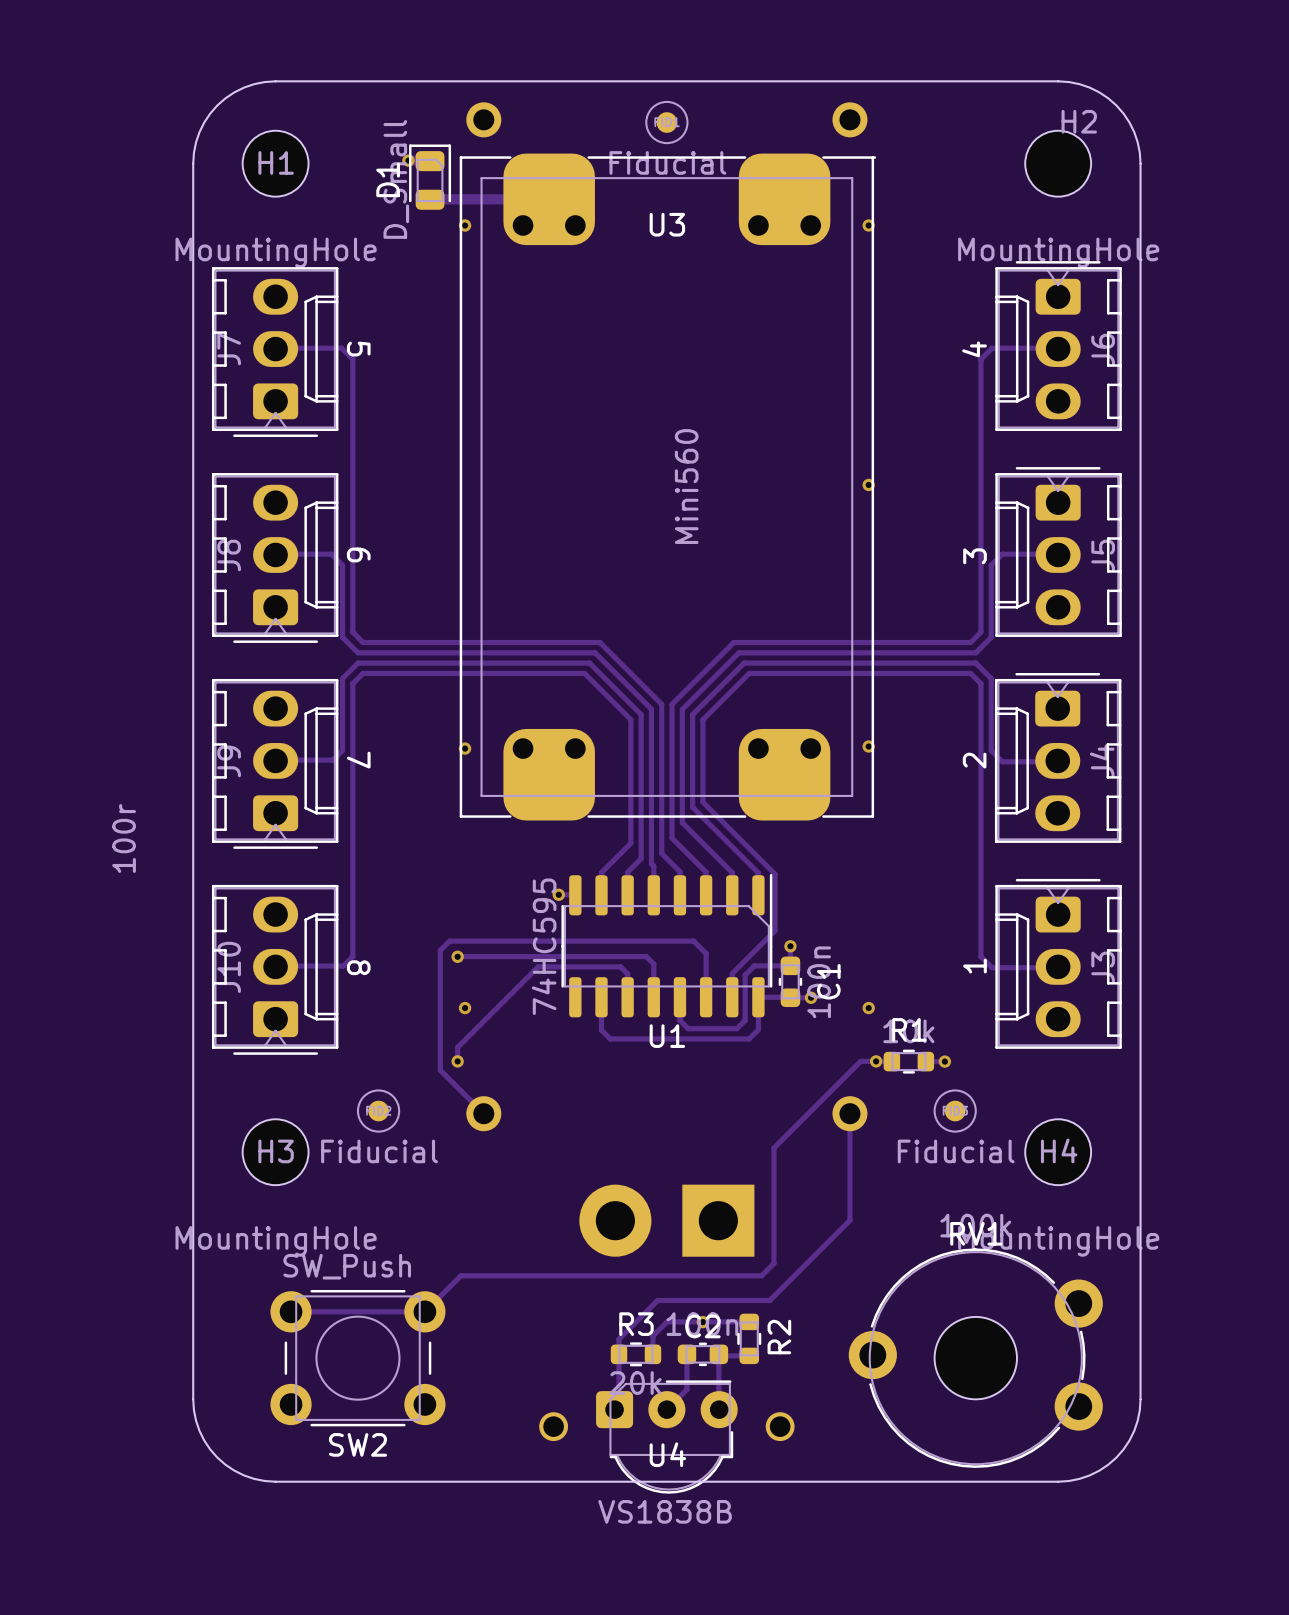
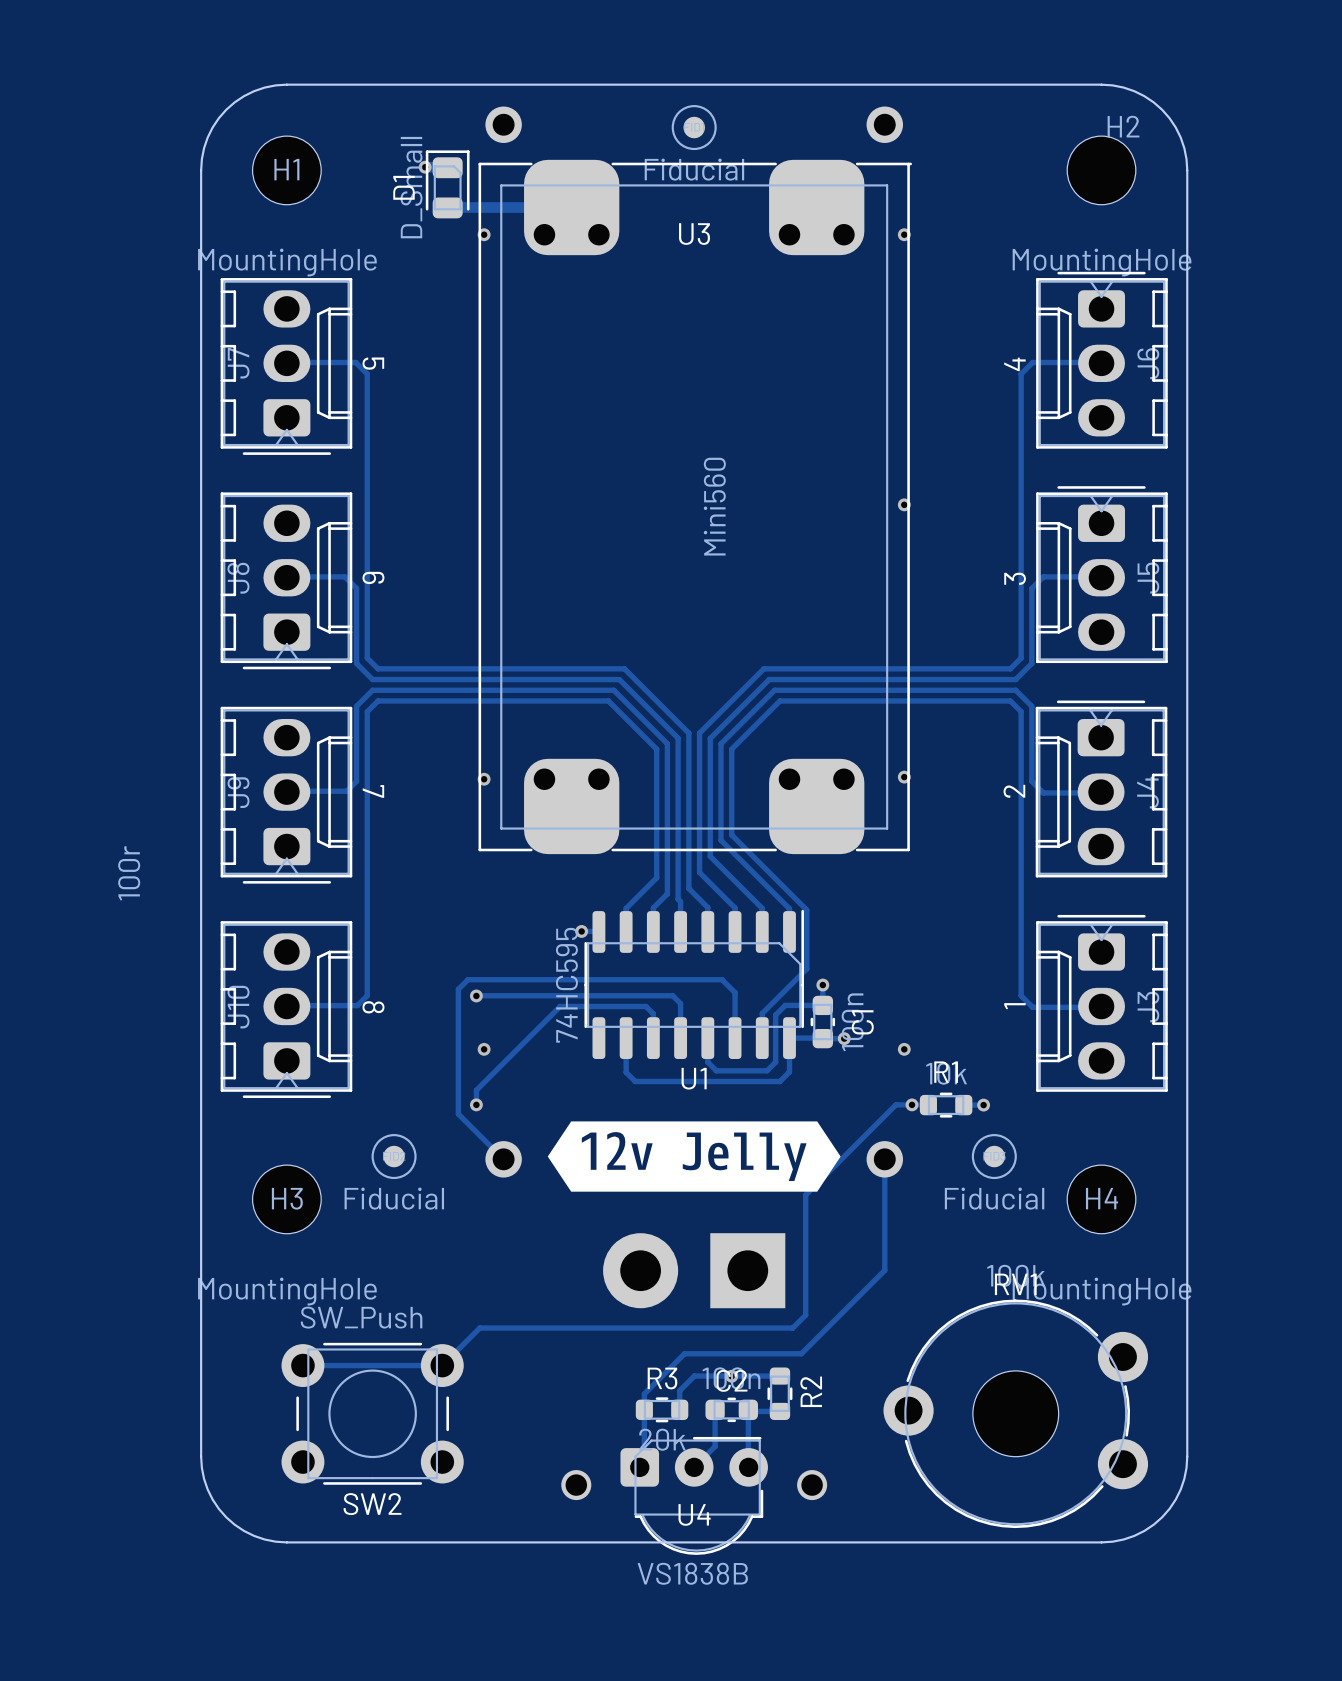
drawing: none -> [547, 1121, 841, 1192]

